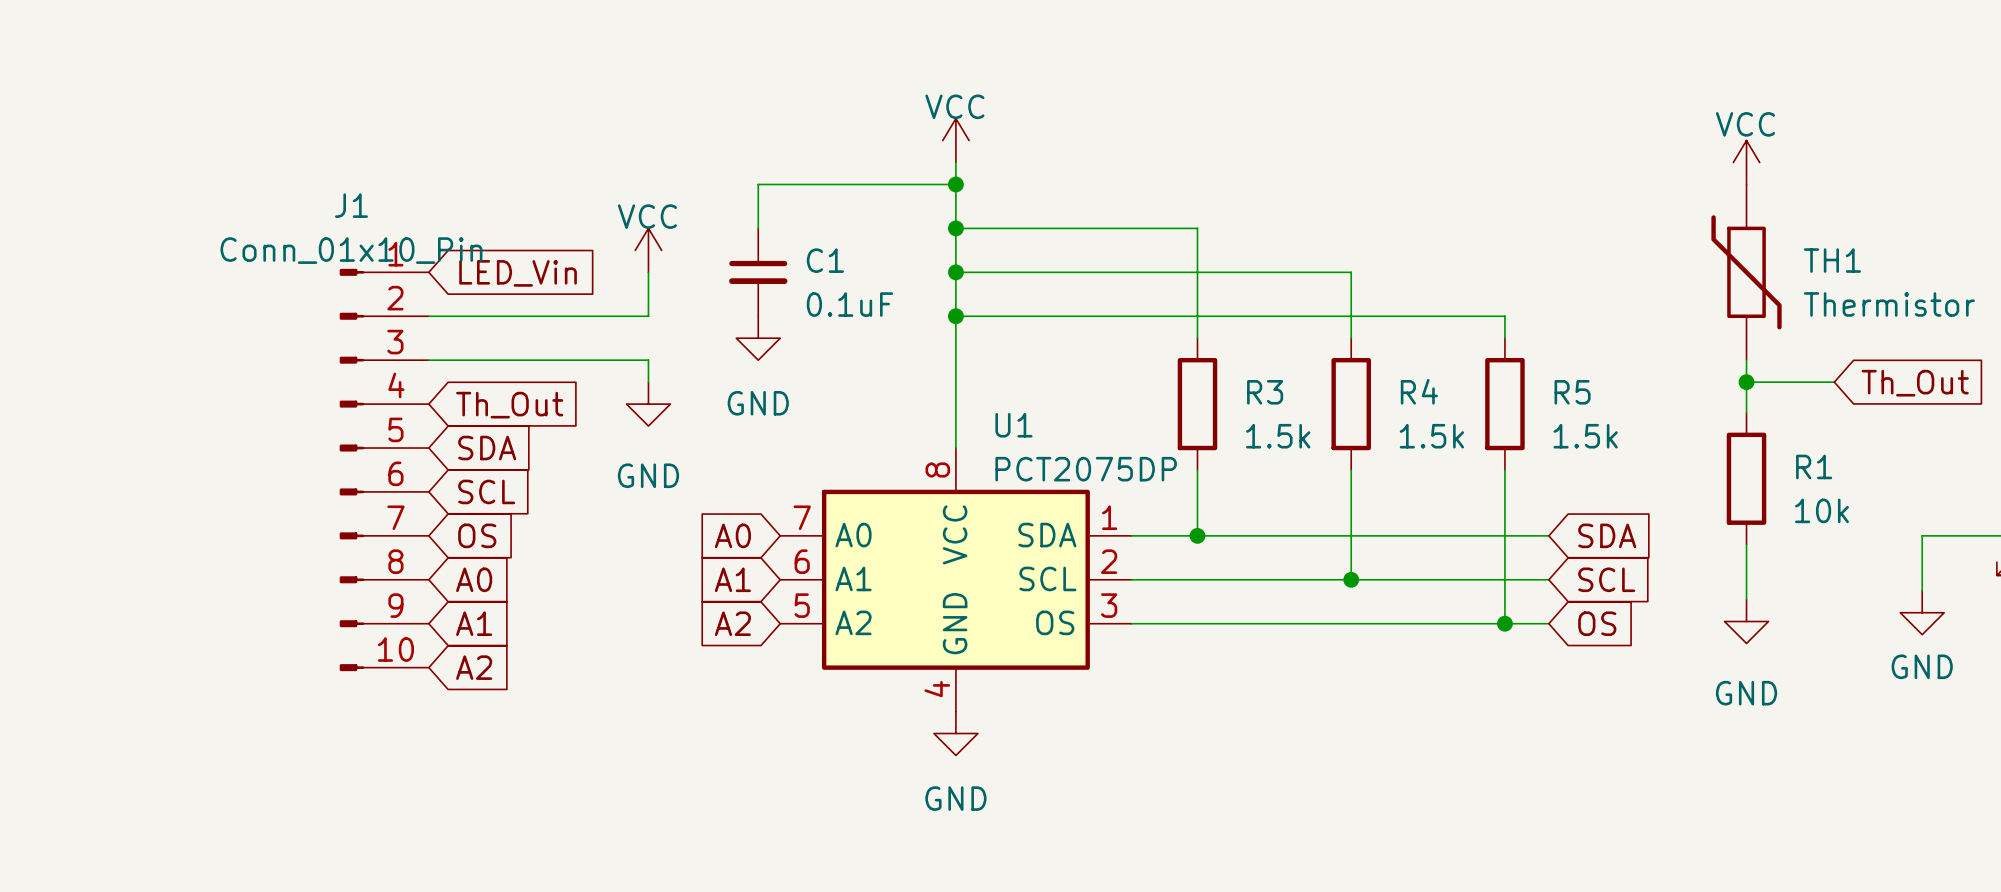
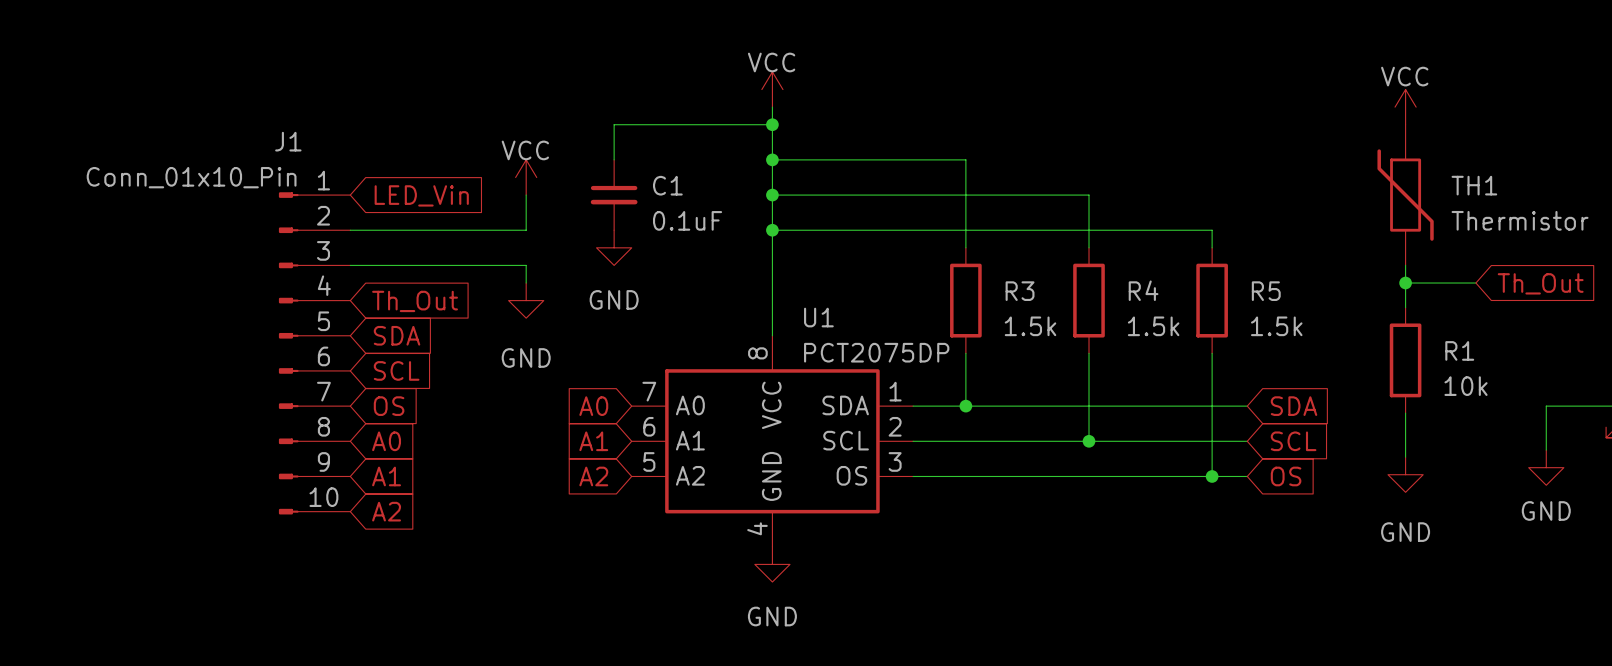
J1 value position: Conn_01x10_Pin (351, 250) -> Conn_01x10_Pin (191, 177)

